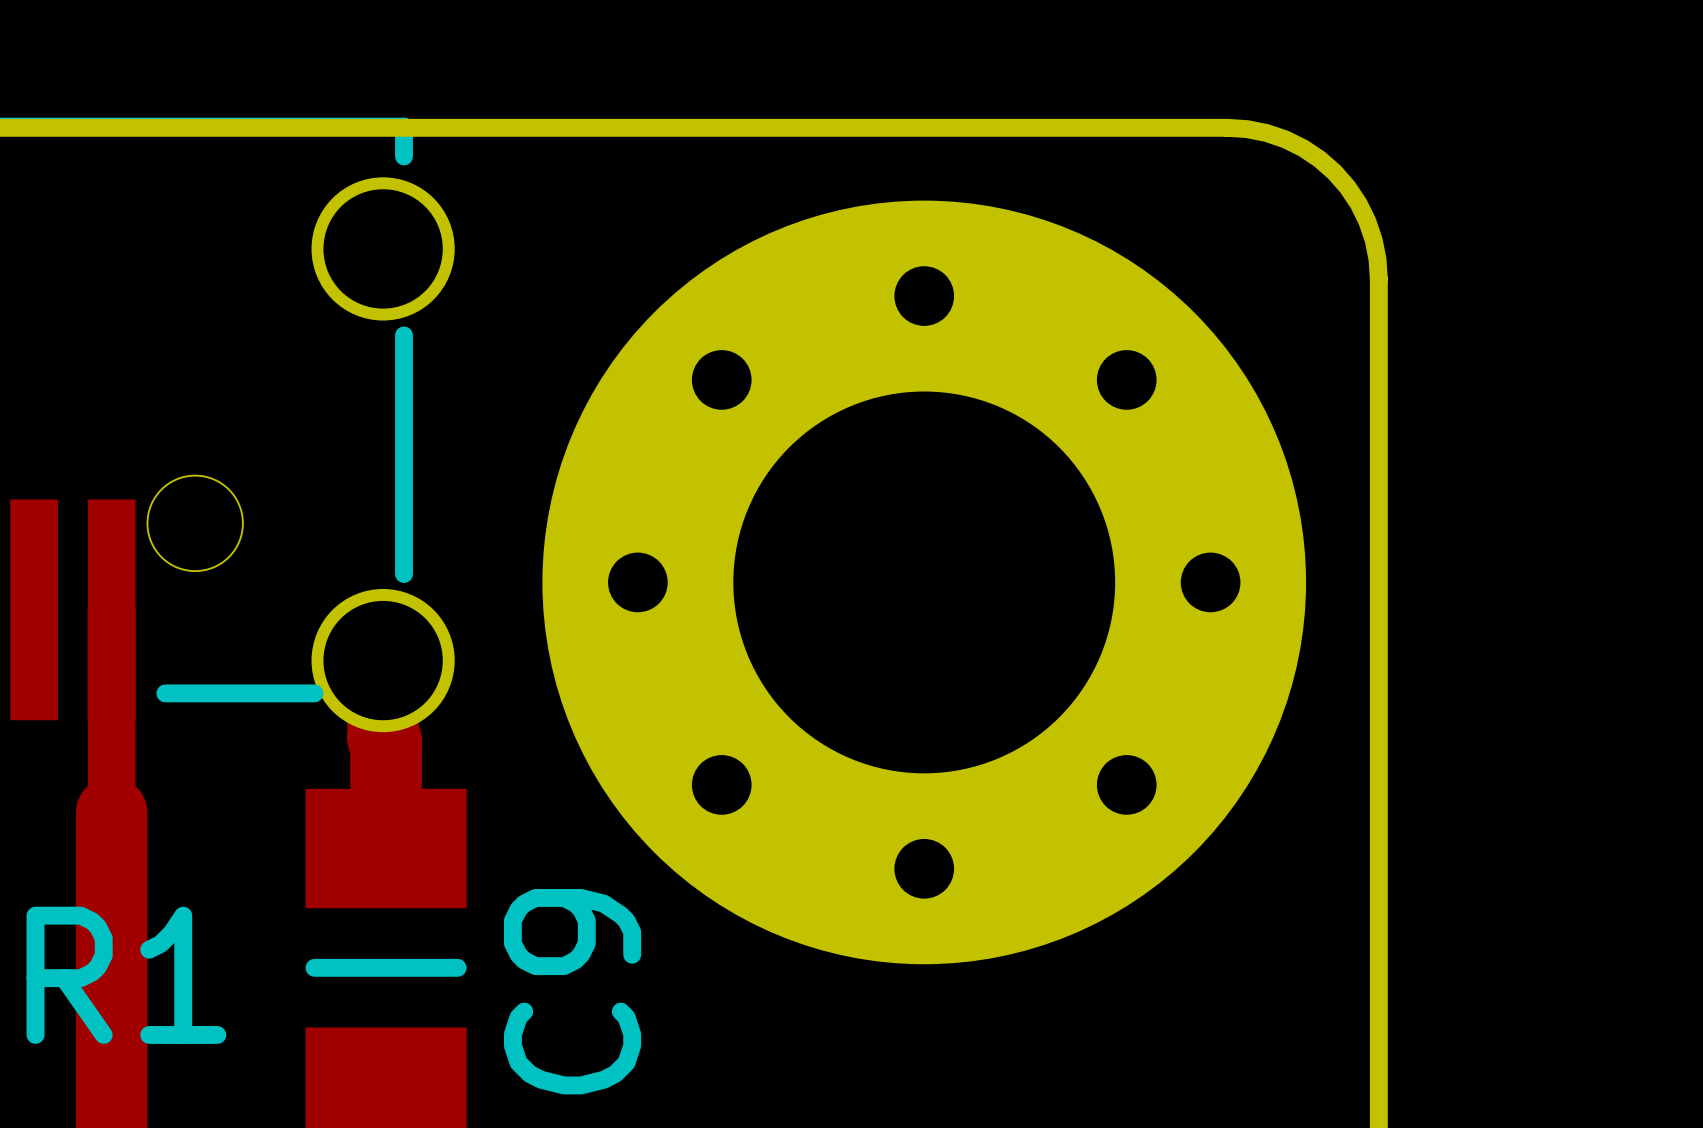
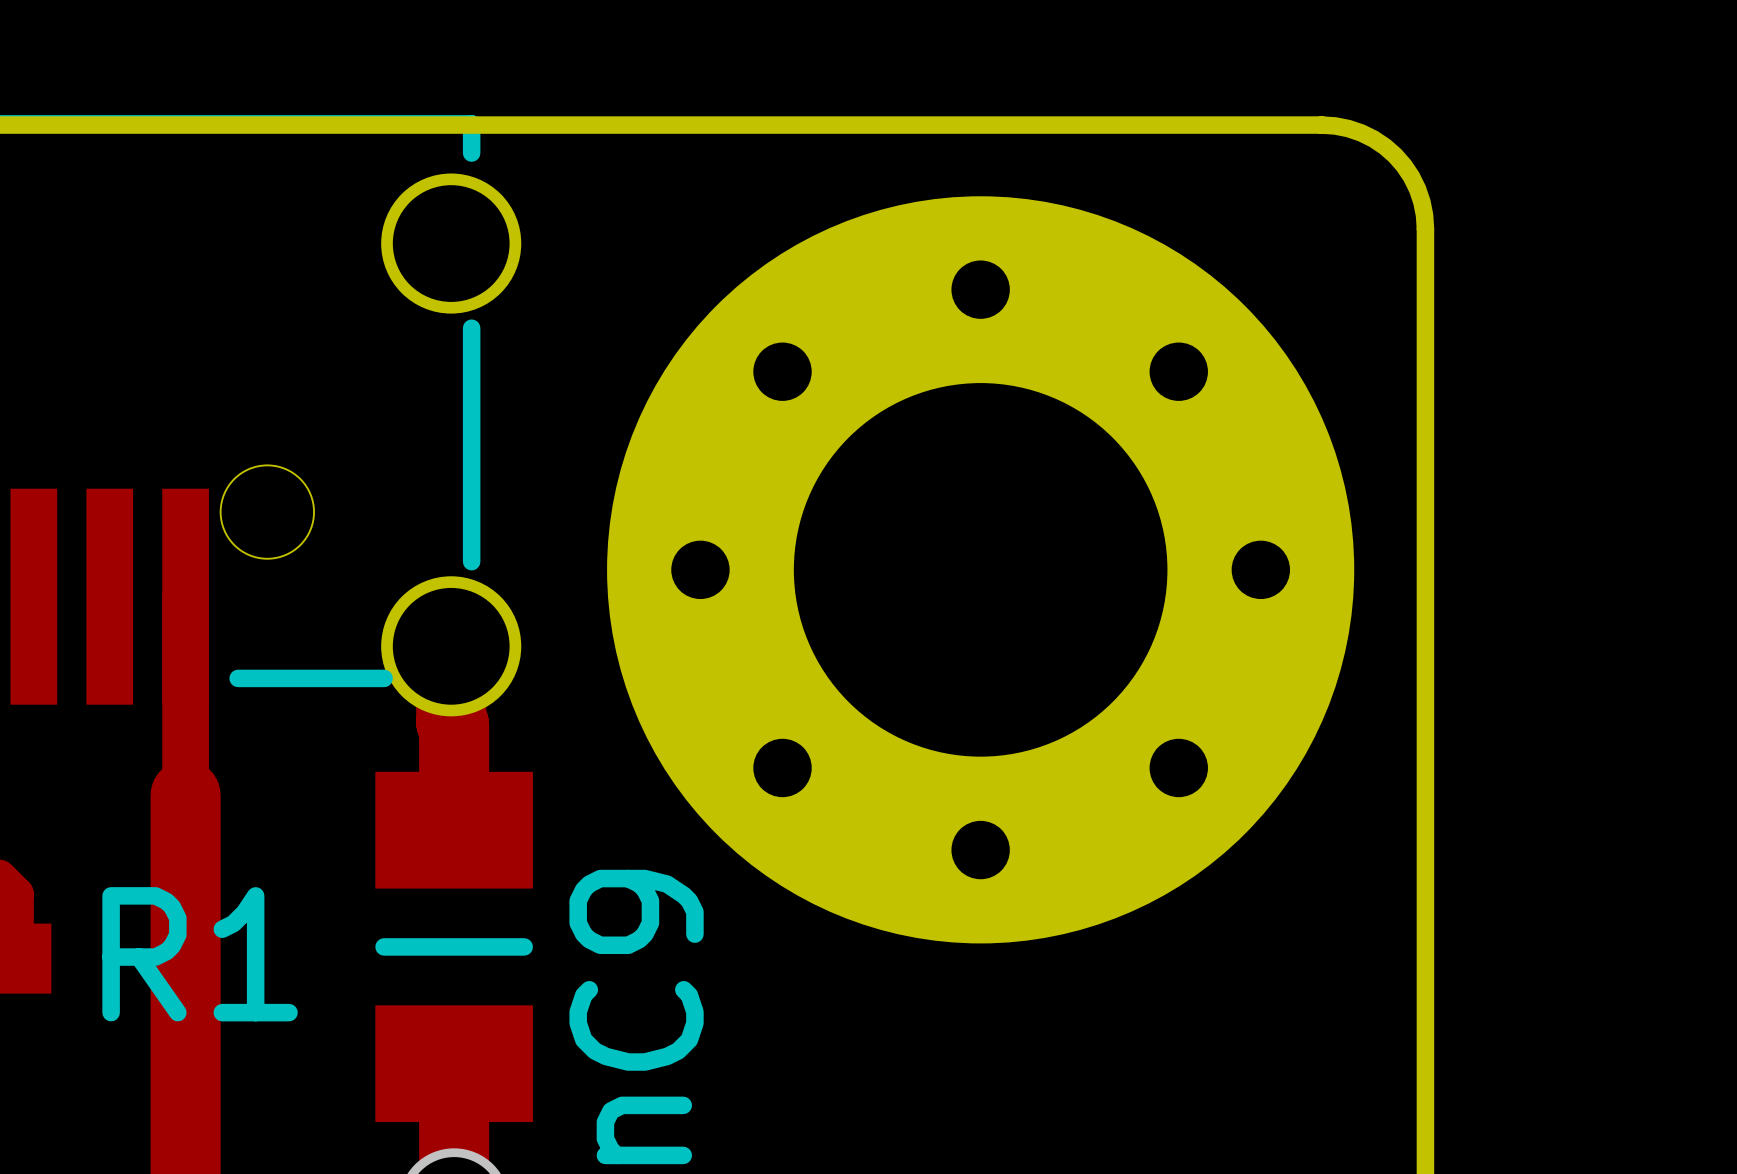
board edge: (1227, 127) (1266, 132) (1285, 139) (1303, 148) (1334, 172) (1358, 203) (1367, 221) (1377, 259) (1378, 279) -> (1277, 125) (1321, 125) (1348, 128) (1373, 138) (1395, 155) (1411, 176) (1421, 201) (1425, 228) (1425, 273)

